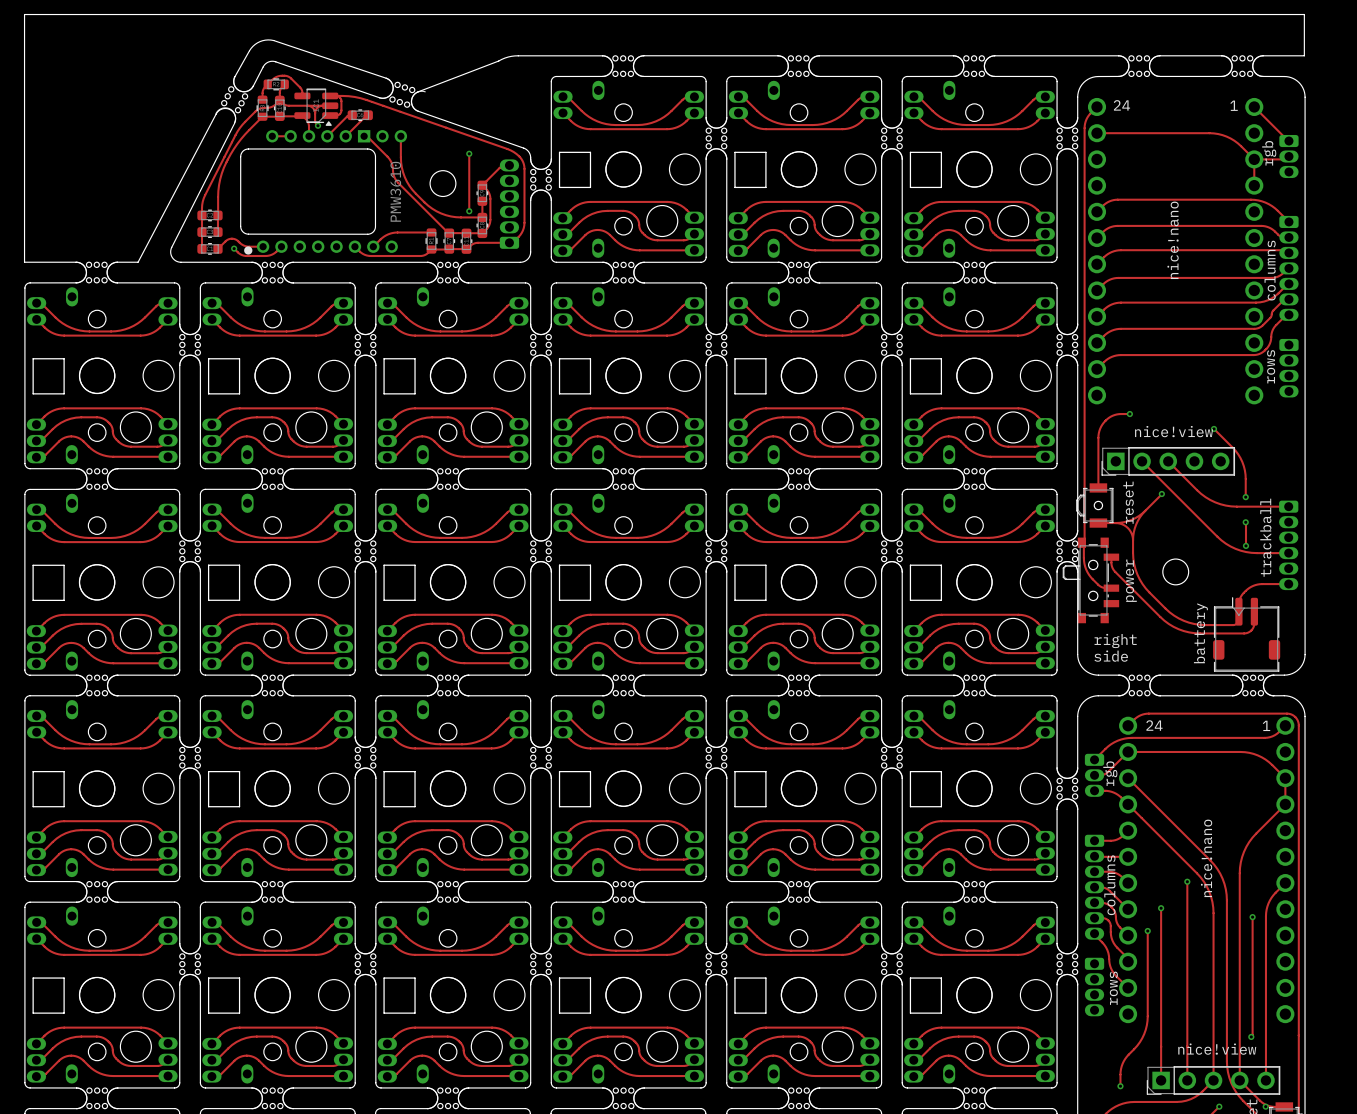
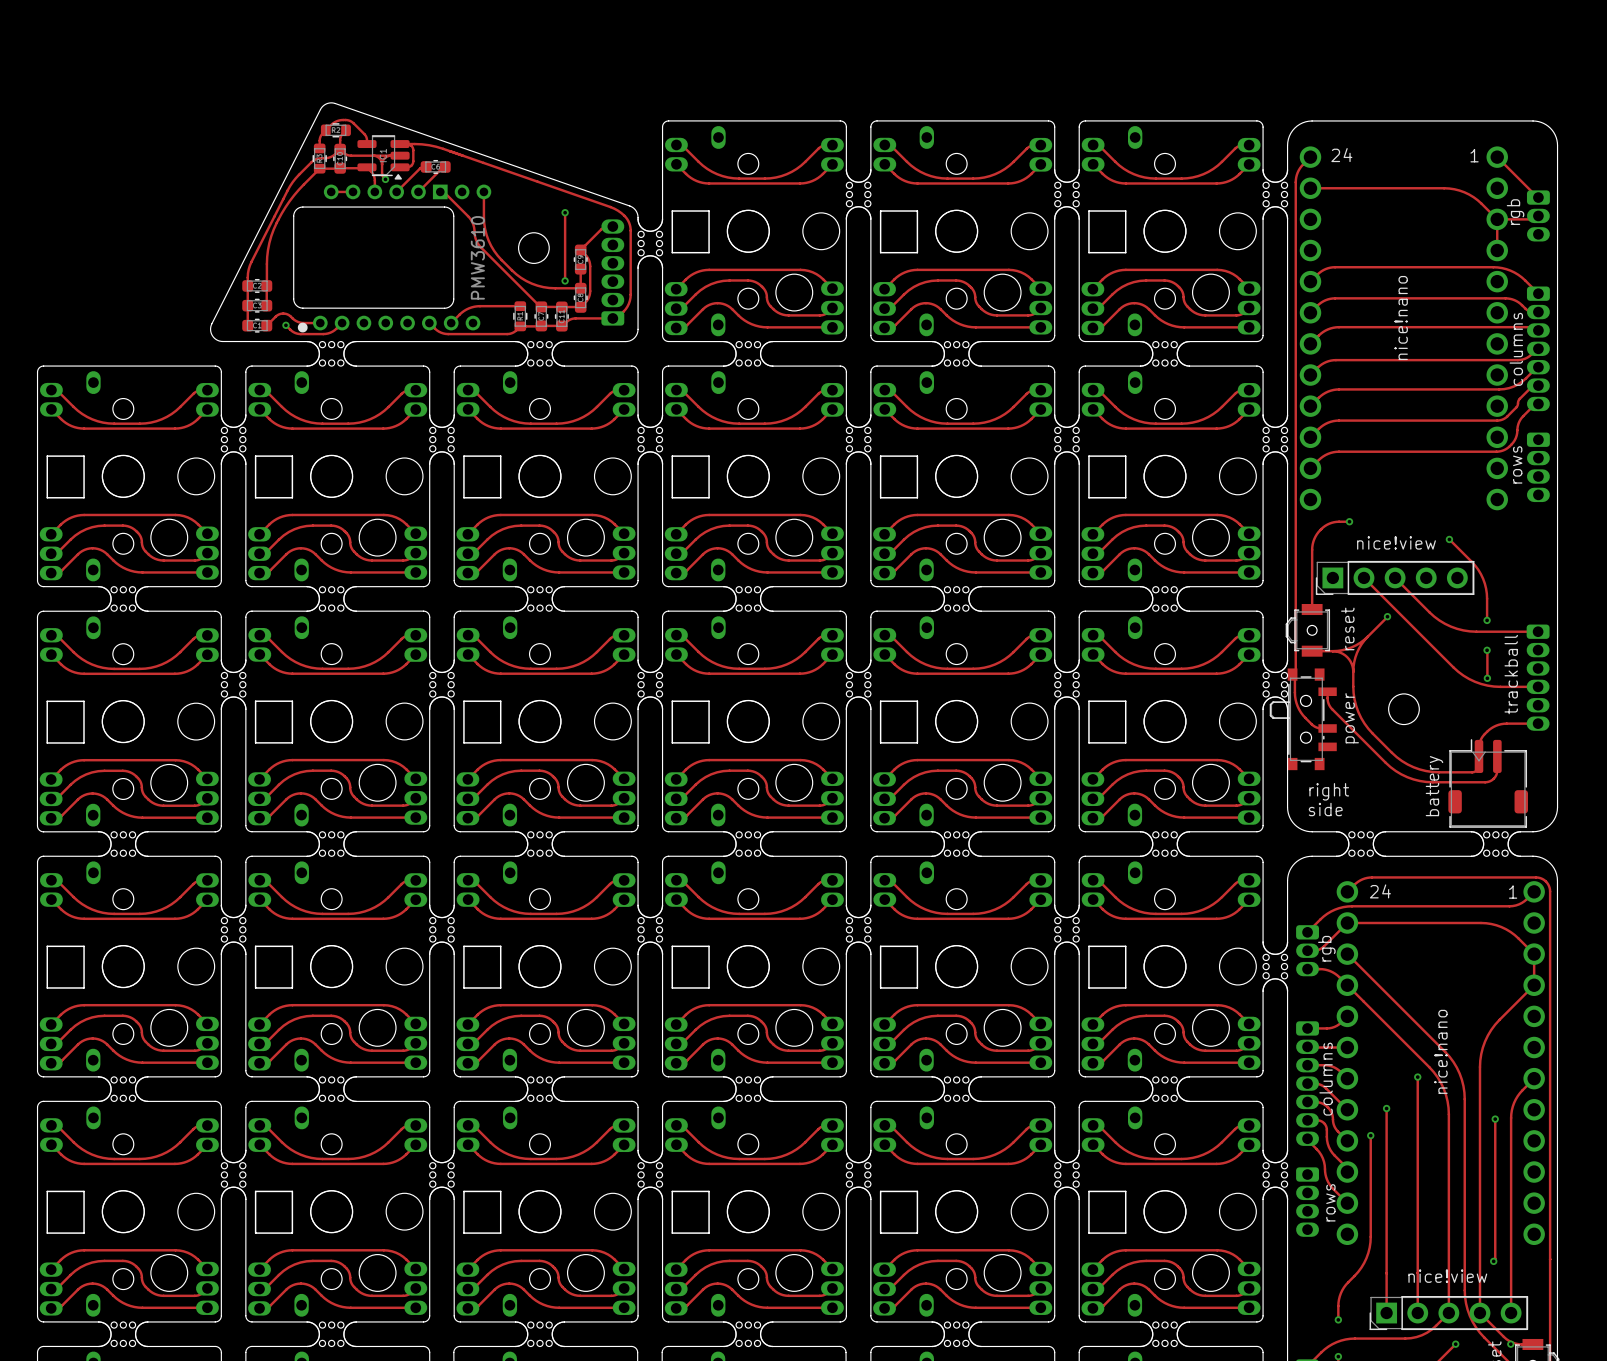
board edge: (273, 40) (387, 78) (392, 85) (392, 92) (387, 96) (380, 98) (272, 61) (264, 64) (250, 89) (244, 91) (238, 89) (234, 84) (234, 78) (251, 48) (262, 40) (273, 40) -> none
board edge: (602, 55) (608, 57) (612, 63) (612, 70) (607, 75) (555, 76) (551, 81) -> (840, 120) (668, 120) (664, 122) (662, 127)
board edge: (602, 55) (511, 56) (417, 91) (412, 96) (411, 104) (417, 110) (523, 148) (528, 151) (530, 157) -> (286, 176) (321, 108) (325, 104) (332, 102) (629, 206) (635, 210) (638, 217)
board edge: (1159, 55) (1223, 55) (1229, 59) (1232, 67) (1229, 73) (1223, 76) (1158, 76) (1151, 72) (1149, 66) (1152, 58) (1159, 55) -> none
part: (623, 66) -> none
part: (798, 66) -> none
part: (974, 66) -> none
part: (1139, 66) -> none
part: (1242, 66) -> none
board edge: (700, 76) (642, 76) (635, 72) (633, 64) (637, 57) (643, 55) (777, 55) (784, 57) (787, 63) (786, 71) (780, 76) (731, 76) (726, 81) -> none
board edge: (876, 76) (817, 76) (811, 72) (809, 64) (812, 57) (819, 55) (953, 55) (959, 57) (963, 63) (962, 71) (956, 76) (906, 76) (902, 81) -> (1048, 120) (877, 120) (872, 122) (870, 127)
board edge: (1098, 76) (1123, 75) (1128, 68) (1127, 60) (1118, 55) (994, 55) (988, 57) (984, 63) (985, 71) (992, 76) (1052, 76) (1057, 81) -> (1079, 127) (1081, 122) (1085, 120) (1256, 120) (1261, 122) (1263, 127)
part: (402, 94) -> none
board edge: (1305, 97) (1303, 88) (1295, 79) (1286, 76) (1260, 76) (1254, 72) (1252, 66) (1254, 59) (1260, 56) (1304, 55) (1304, 14) (24, 14) (24, 262) (77, 262) (84, 266) (86, 272) (84, 278) (78, 282) (29, 282) (24, 288) -> (1557, 145) (1555, 134) (1550, 128) (1535, 121) (1312, 120)
part: (234, 99) -> none
board edge: (234, 123) (235, 115) (231, 110) (224, 108) (217, 111) (138, 262) (114, 262) (107, 269) (108, 277) (114, 282) (175, 282) (179, 288) -> (37, 372) (39, 367) (43, 366) (215, 366) (219, 367) (221, 372)
part: (96, 272) -> none

